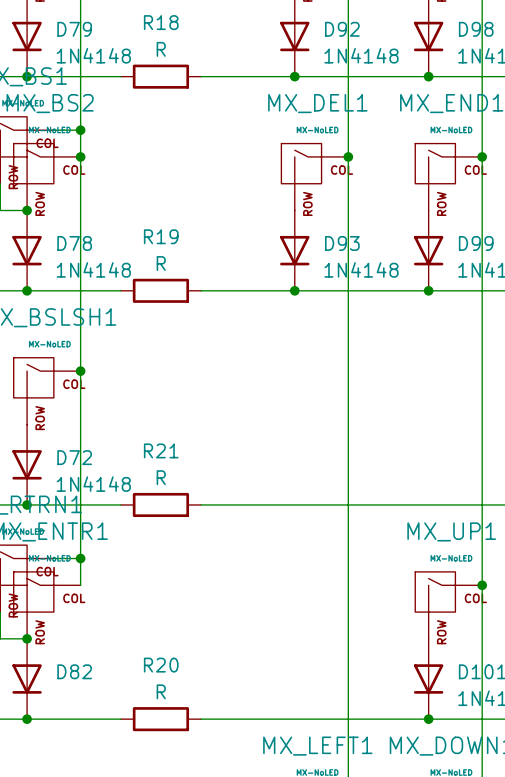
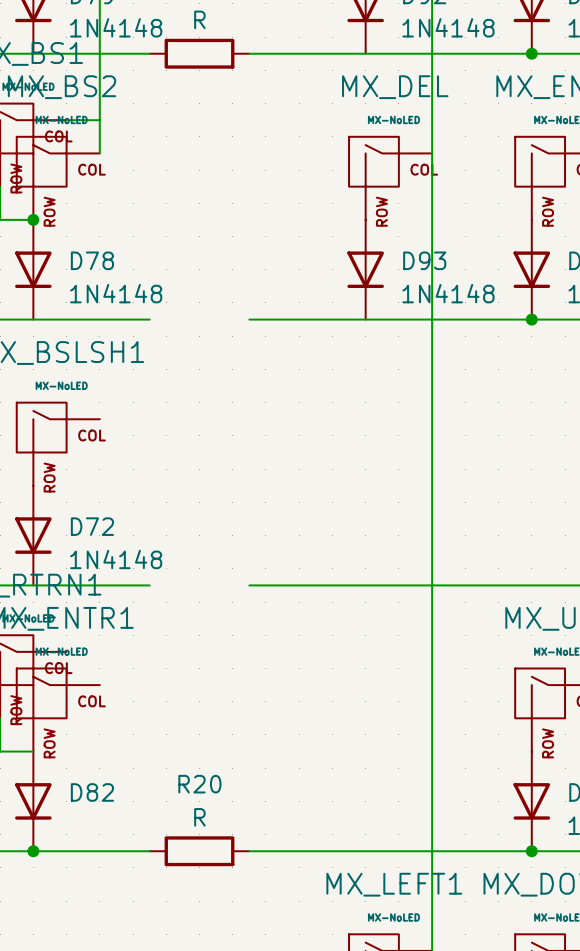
junction: (27, 76) -> none
junction: (294, 76) -> none
MX_DEL1 name: MX_DEL1 (317, 103) -> MX_DEL (395, 87)
junction: (80, 130) -> none
wire: (80, 156) (80, 585) -> none
junction: (80, 156) -> none
junction: (348, 156) -> none
junction: (27, 290) -> none
R19: R (160, 290) -> none
junction: (294, 290) -> none
junction: (80, 371) -> none
junction: (27, 504) -> none
R21: R (160, 504) -> none
wire: (53, 558) (80, 558) -> none
junction: (80, 558) -> none
junction: (27, 638) -> none

